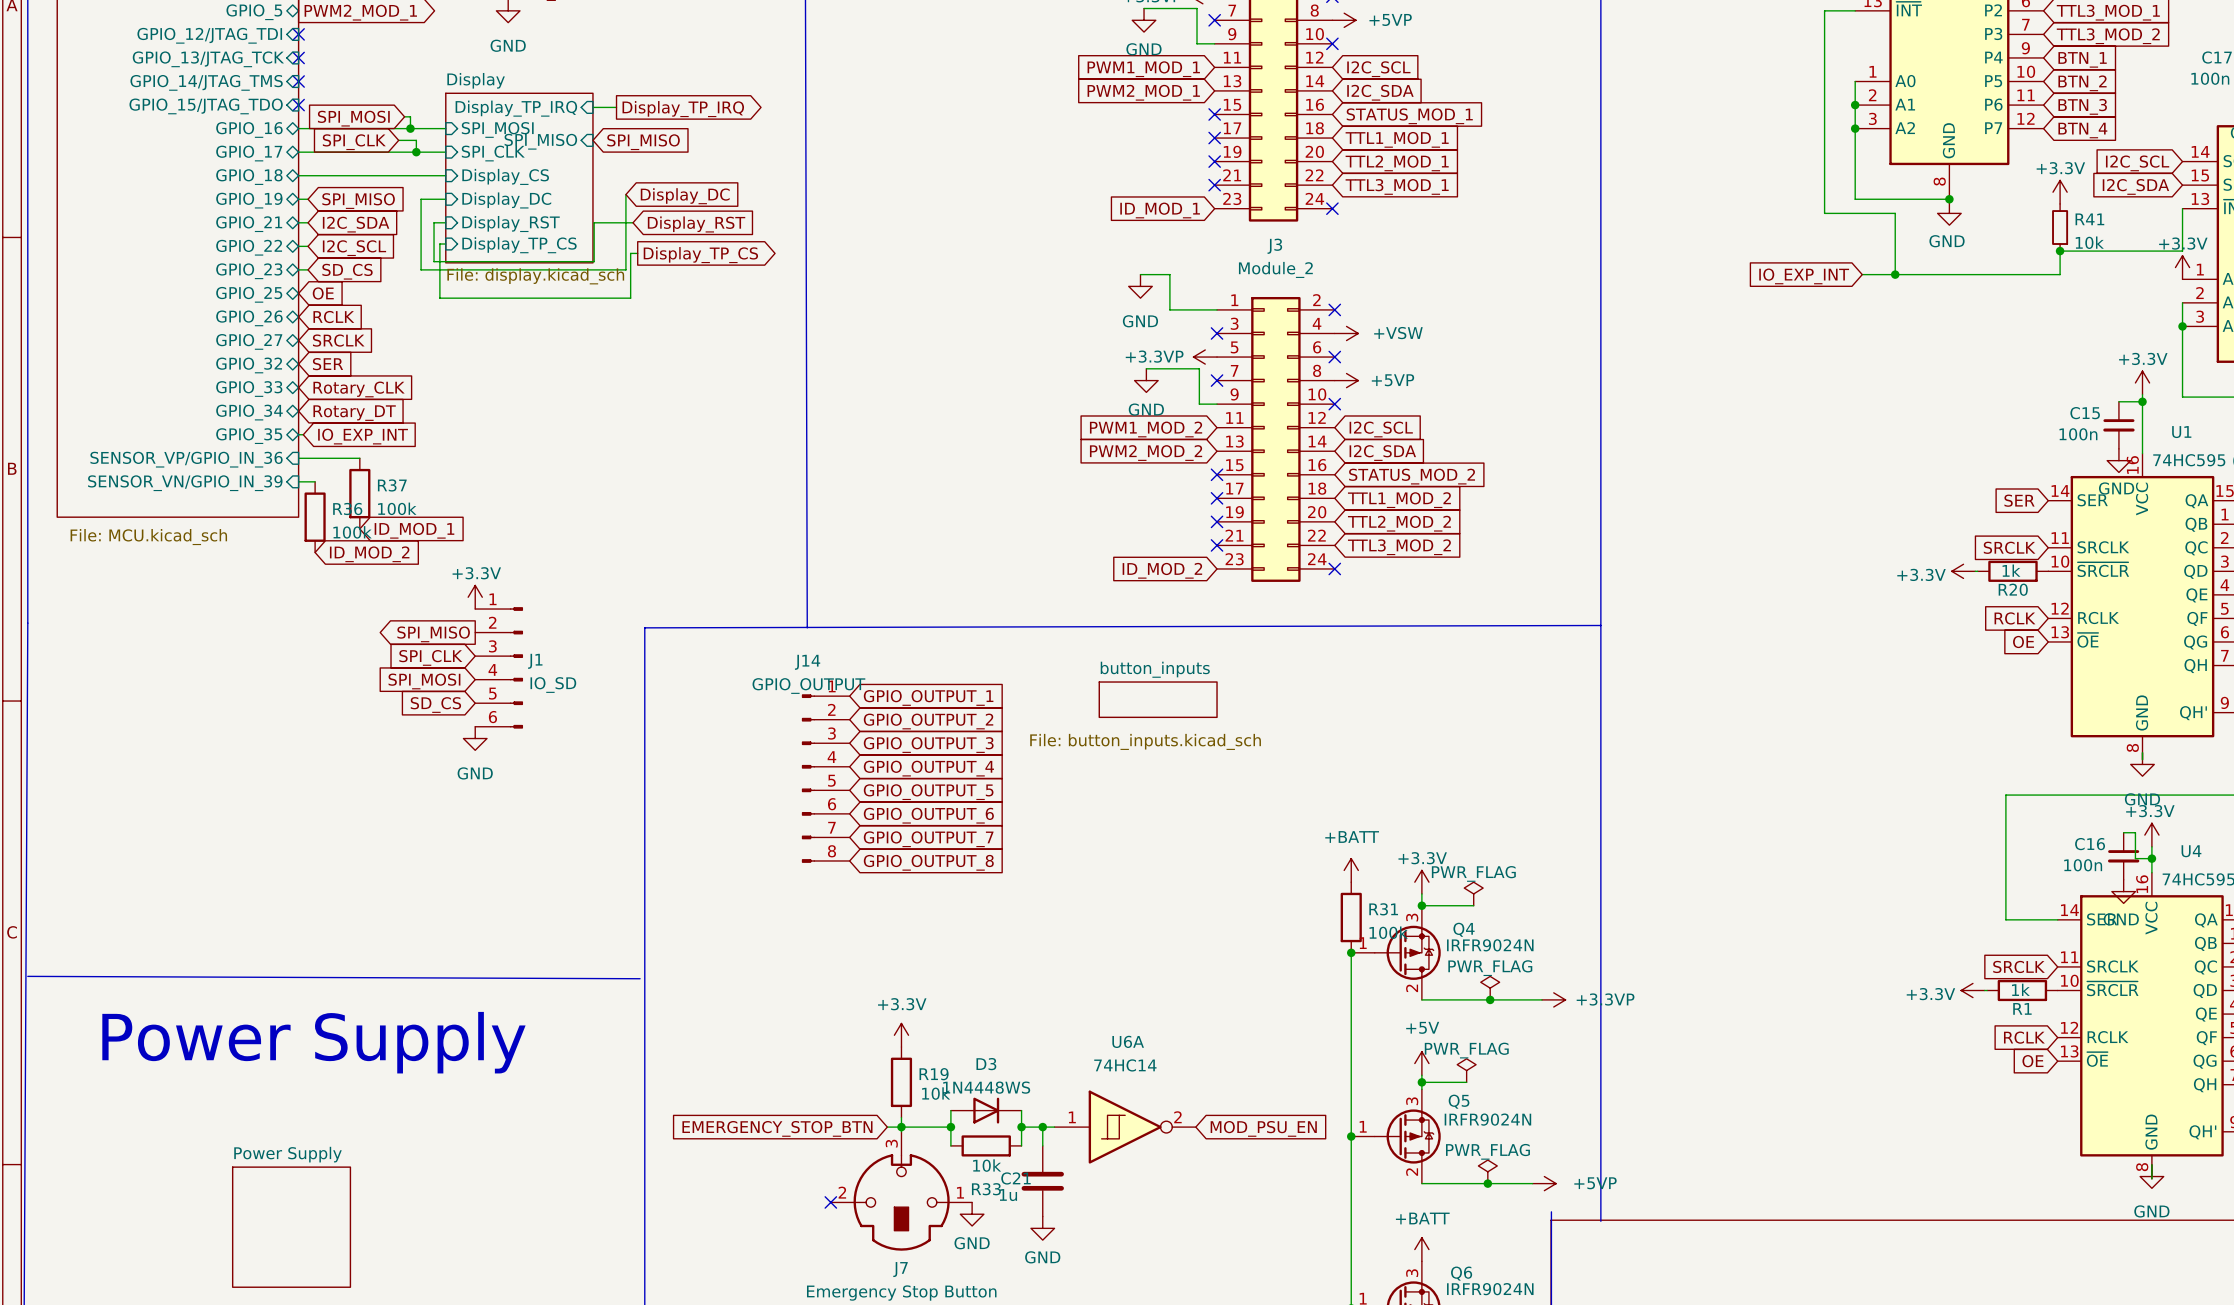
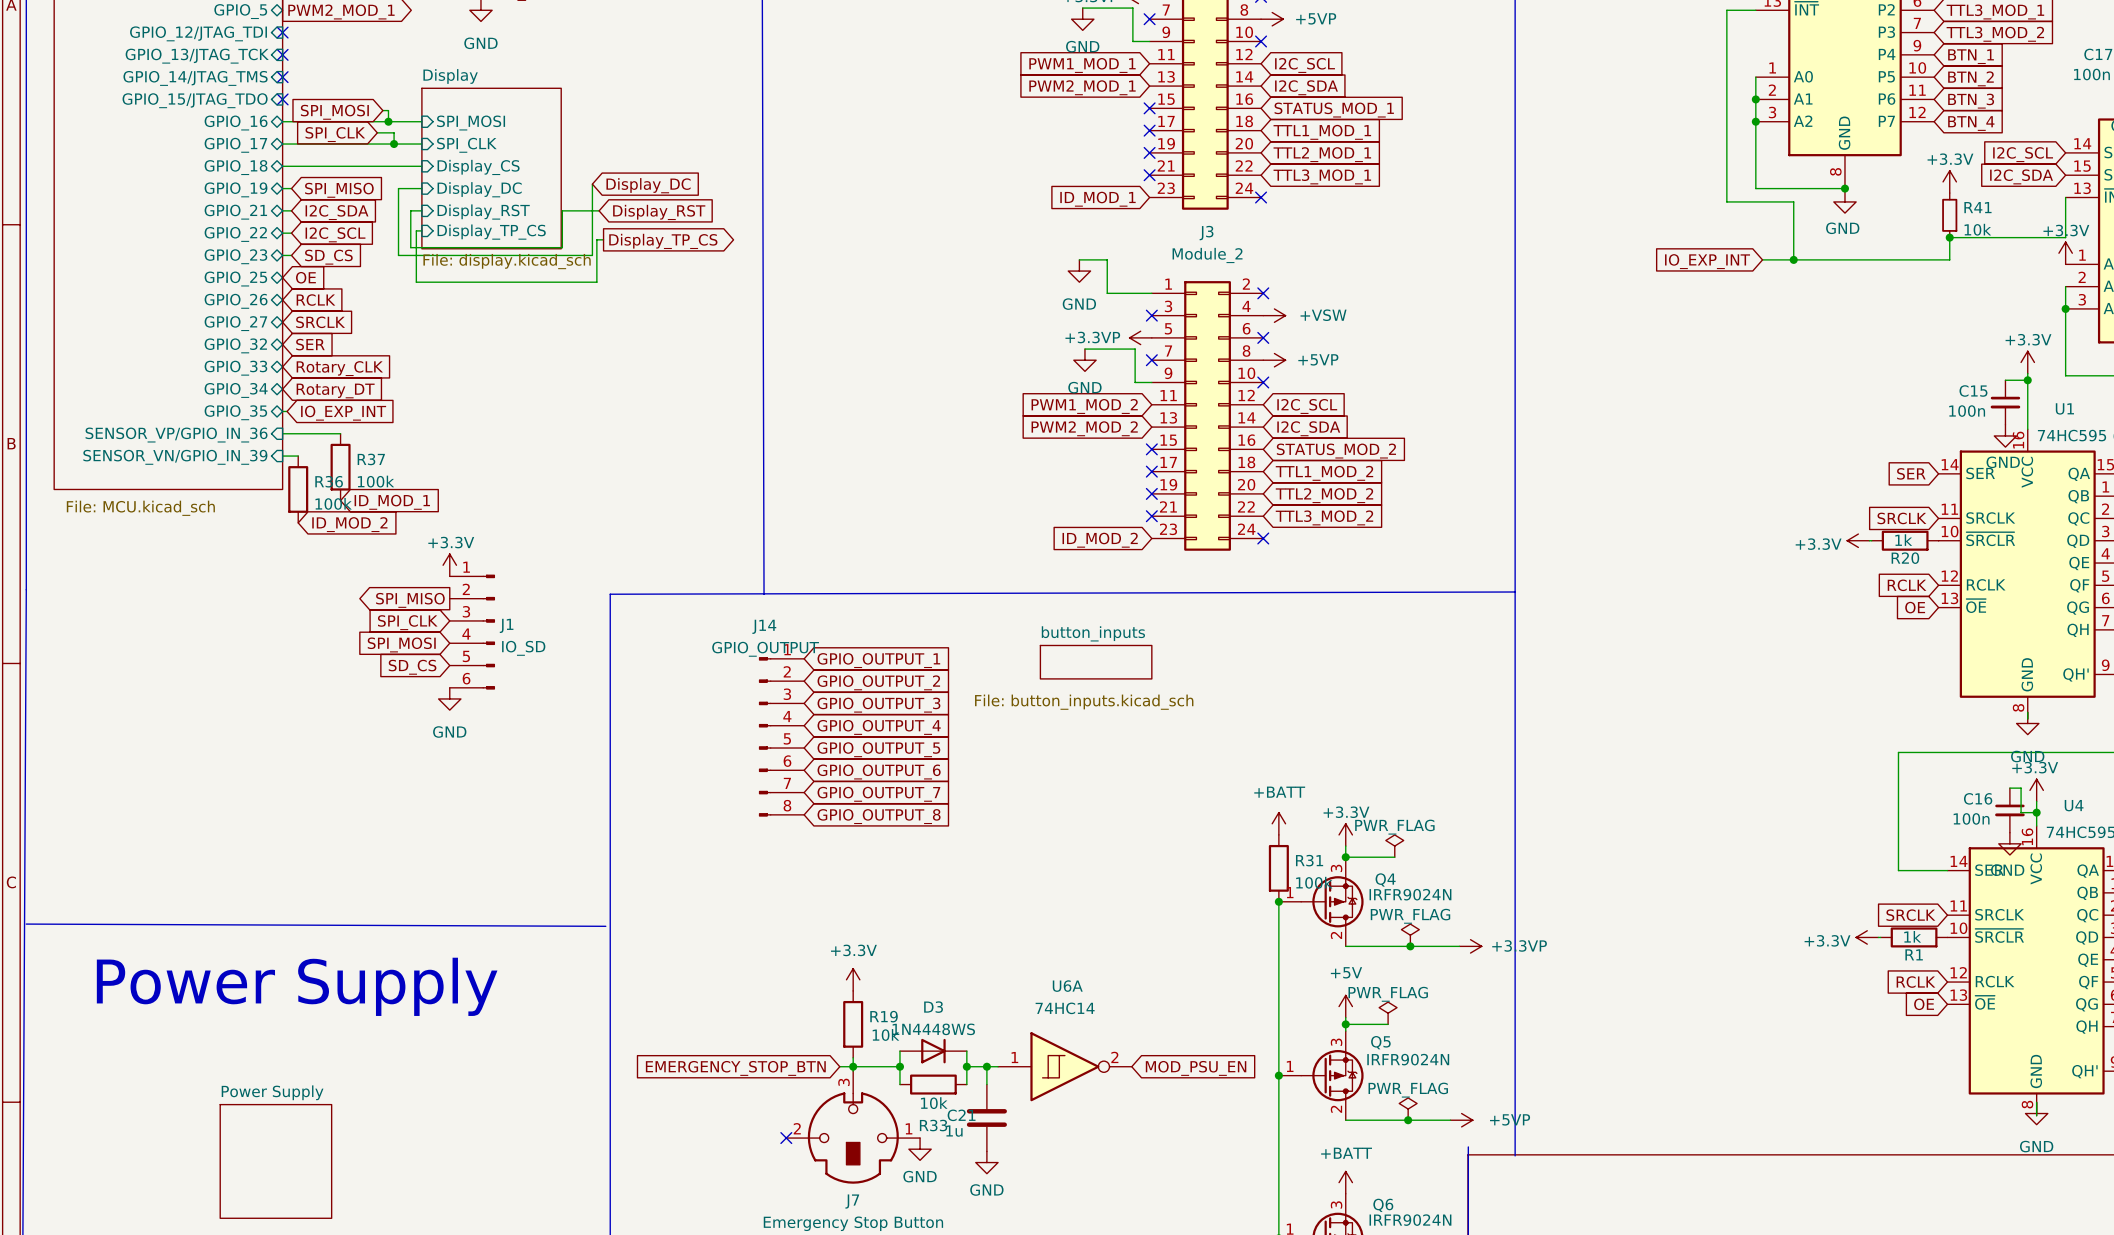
wire: (592, 107) (616, 107) -> none
sheet pin: Display_TP_IRQ (516, 108) -> none
global label: Display_TP_IRQ (683, 109) -> none
sheet pin: SPI_MISO (540, 141) -> none
global label: SPI_MISO (643, 142) -> none

